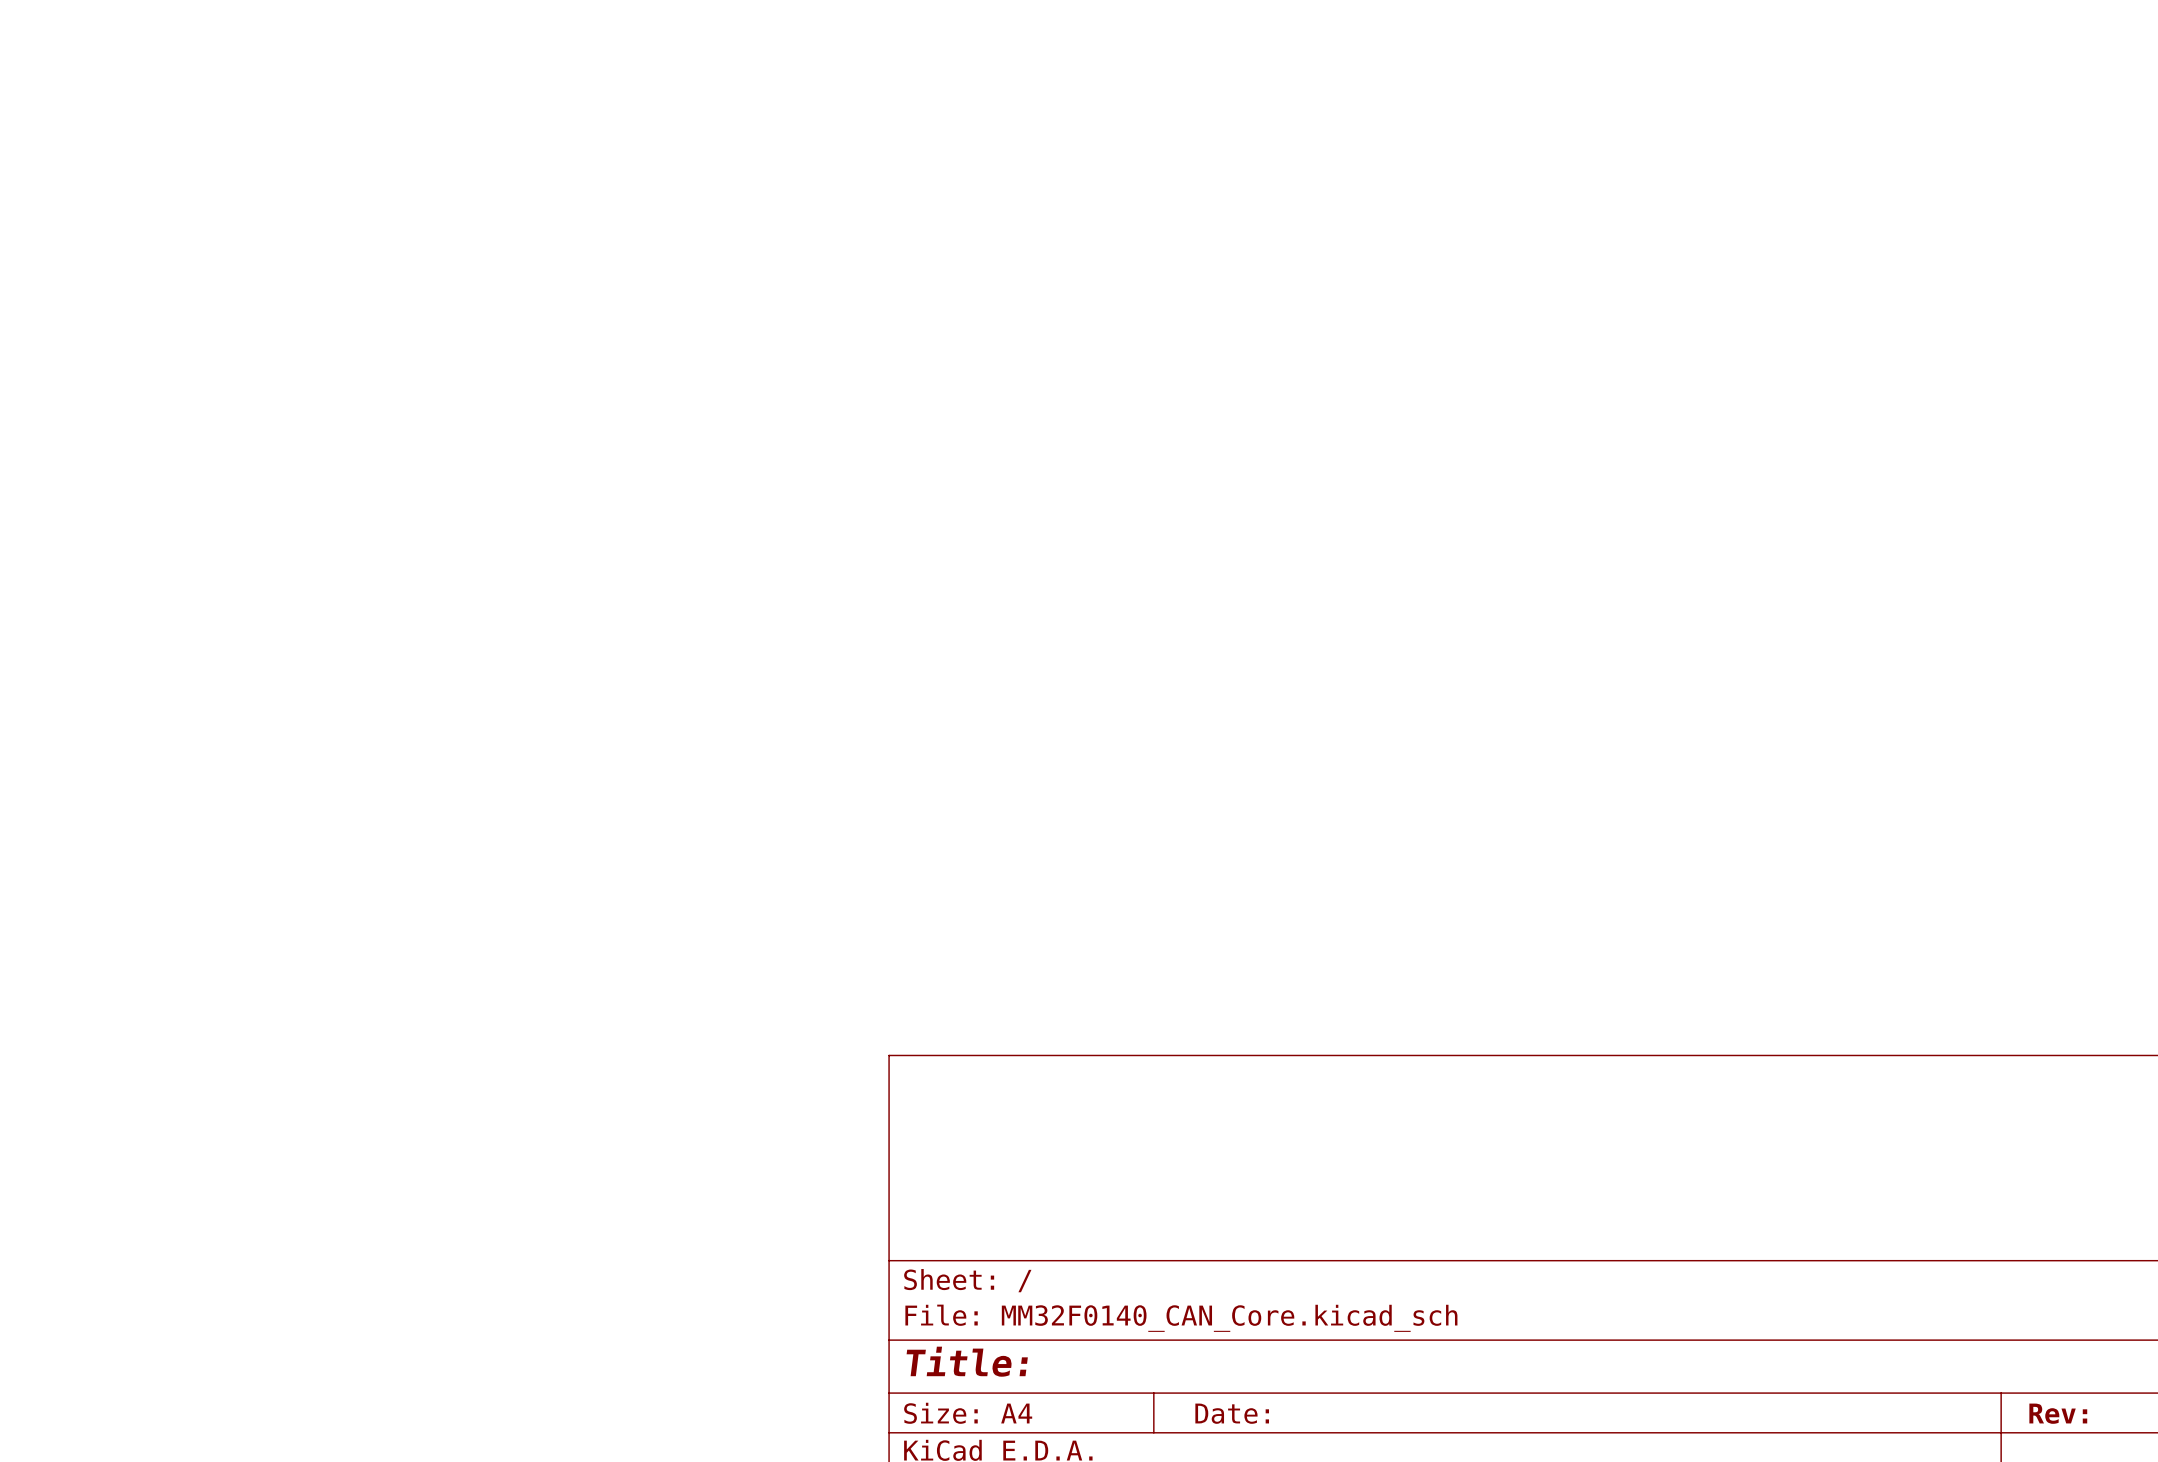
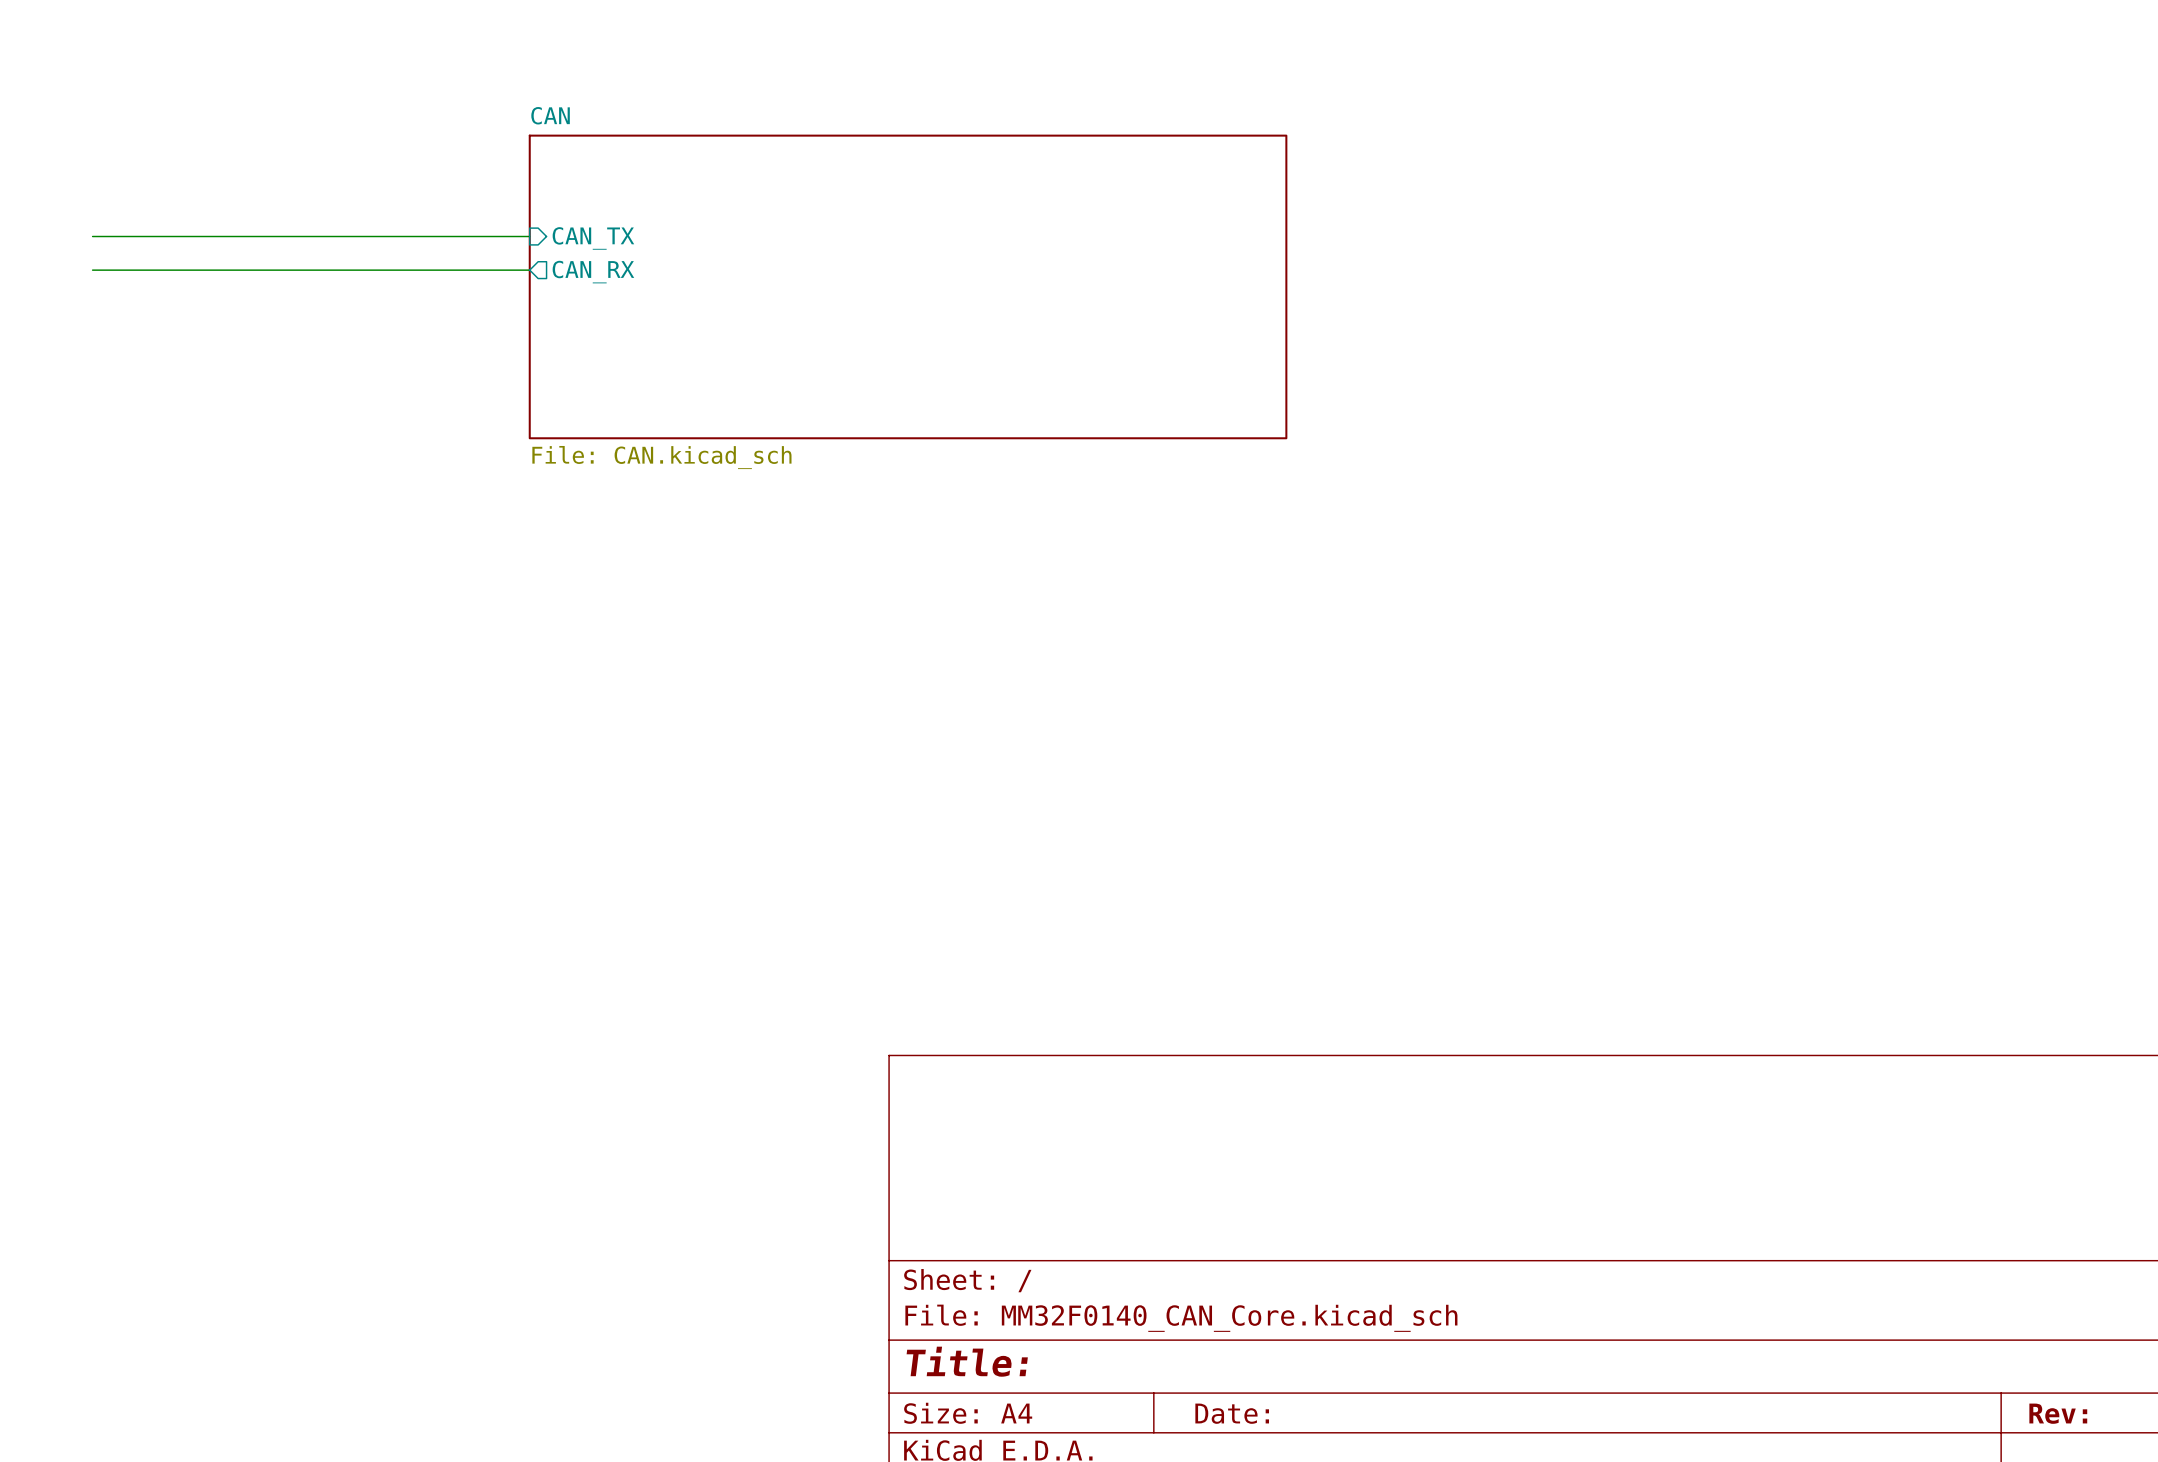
wire: none -> (92, 236) (529, 236)
sheet pin: none -> CAN_TX (593, 238)
wire: none -> (92, 270) (529, 270)
sheet pin: none -> CAN_RX (593, 272)
sheet CAN: none -> File: CAN.kicad_sch (908, 286)

